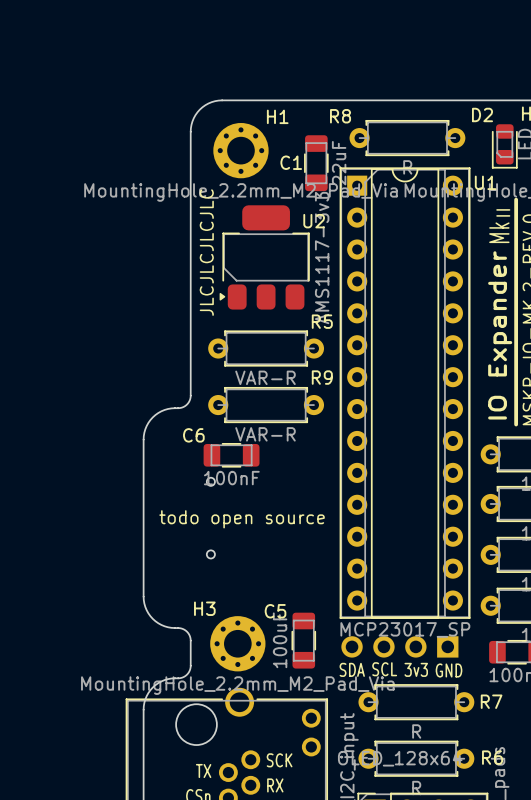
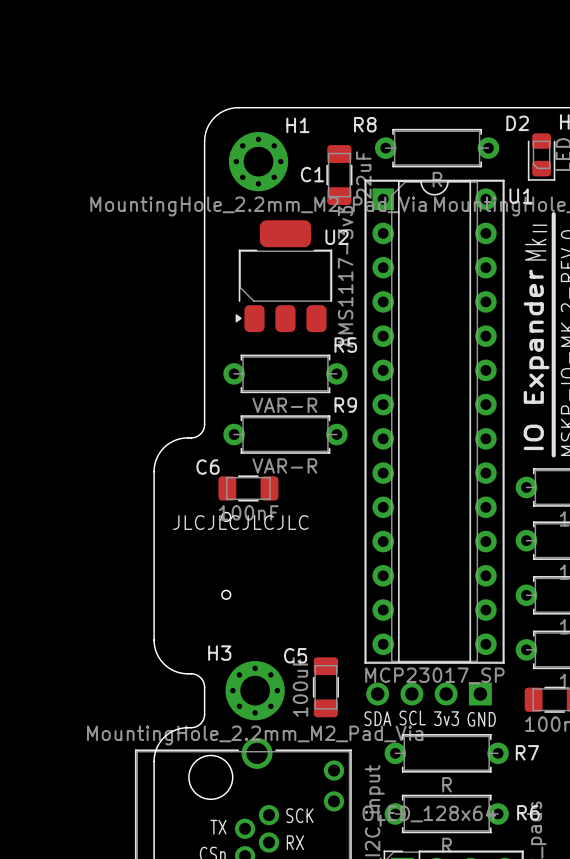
text rotation: 0° (206, 252) -> 90° clockwise (240, 522)
text position: JLCJLCJLCJLC (206, 252) -> JLCJLCJLCJLC (240, 522)
text: todo open source (242, 519) -> none

